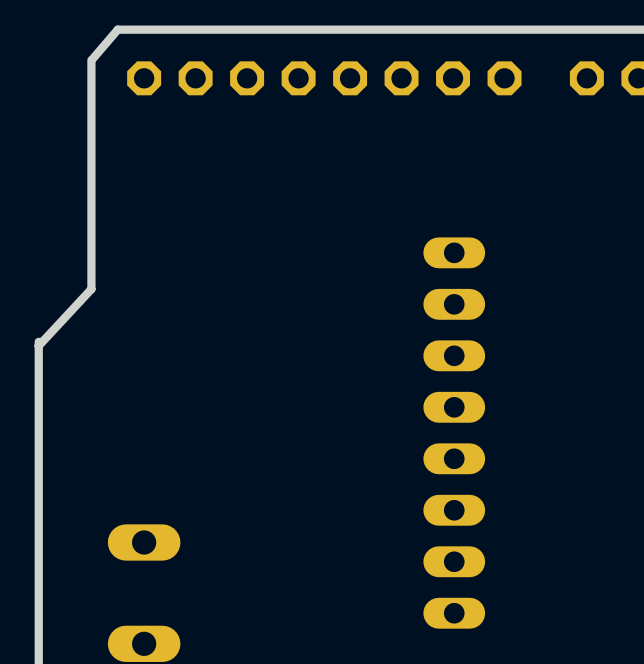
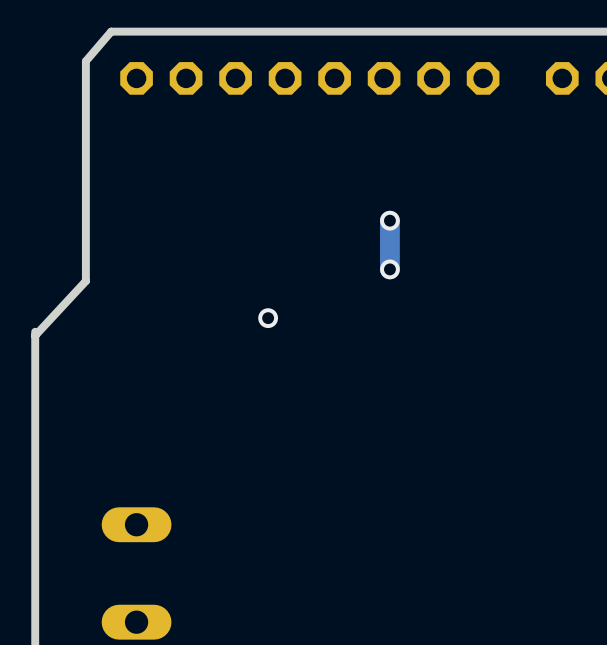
track: none -> (389, 220) (389, 269)
via: none -> (389, 220)
via: none -> (389, 269)
via: none -> (268, 318)
part: (454, 433) -> none

